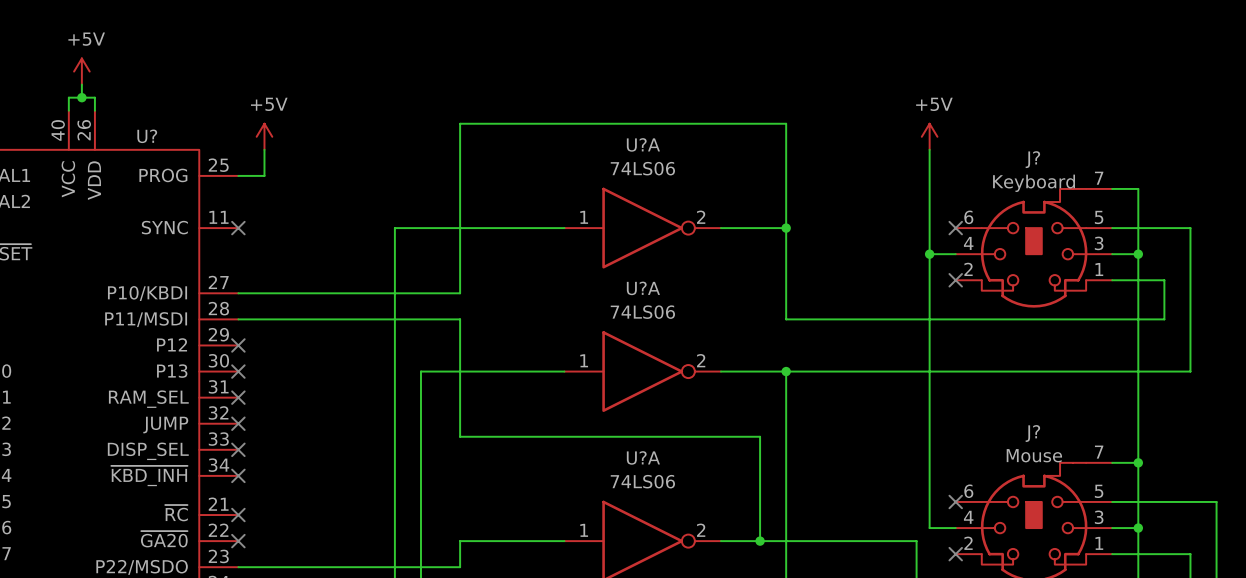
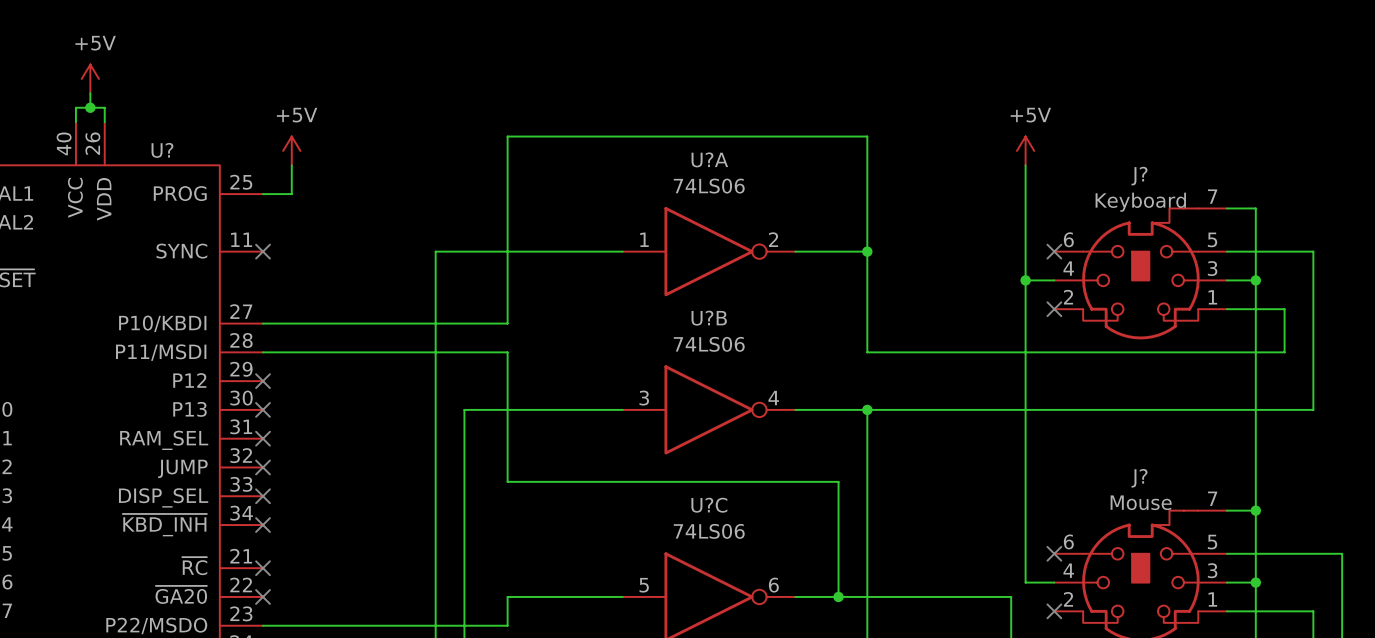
U?A name: U?A (643, 288) -> U?B (709, 318)
U?A pin number: 1 (584, 360) -> 3 (644, 398)
U?A pin number: 2 (701, 360) -> 4 (773, 398)
U?A name: U?A (643, 457) -> U?C (709, 505)
U?A pin number: 1 (584, 530) -> 5 (644, 585)
U?A pin number: 2 (701, 530) -> 6 (773, 585)

